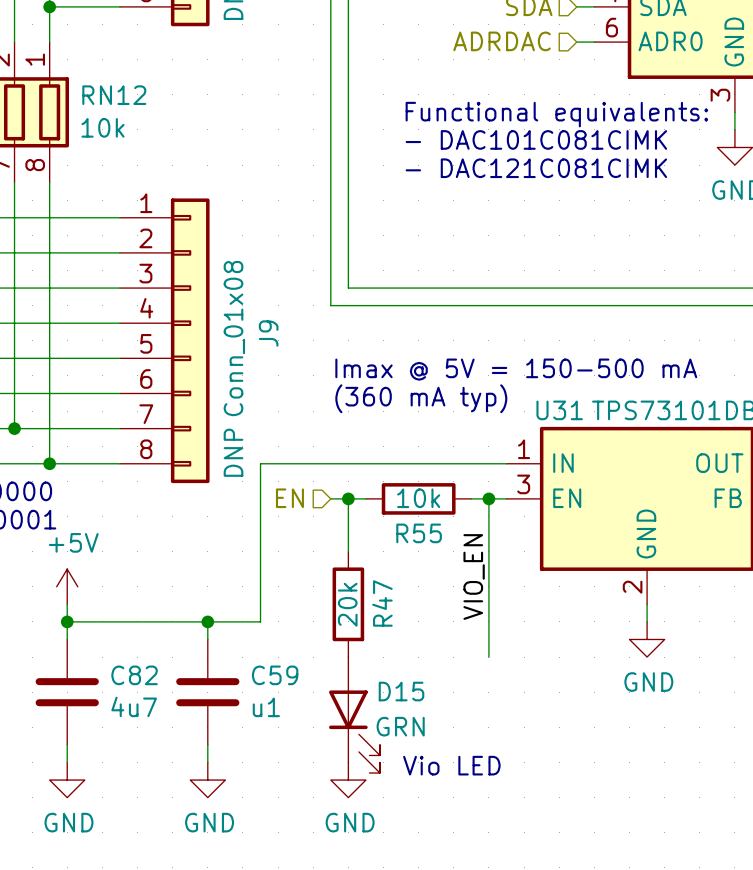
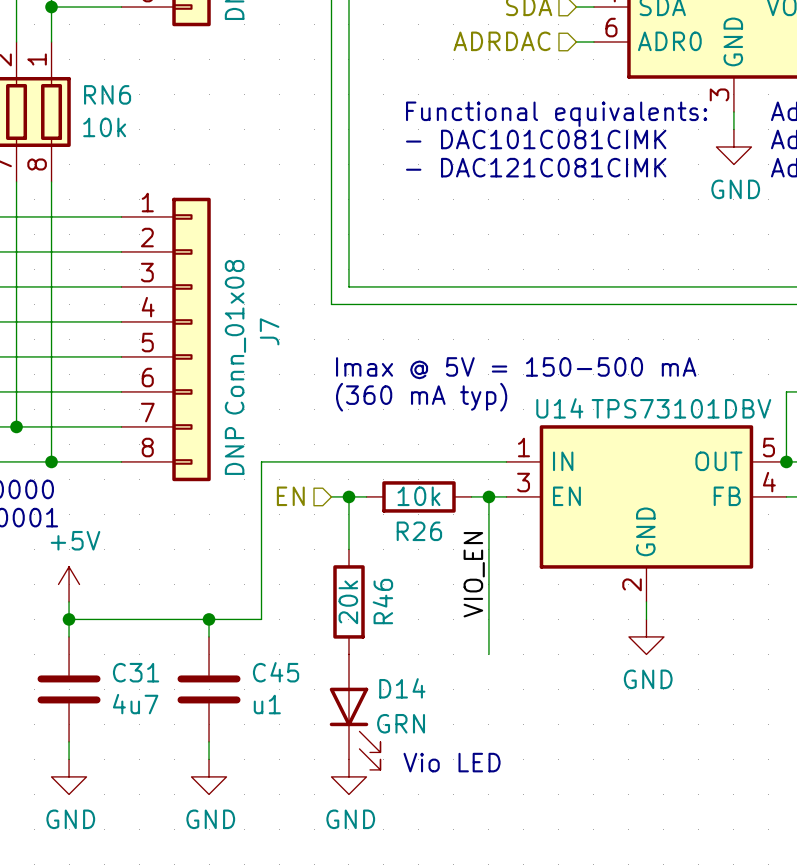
RN12 name: RN12 (114, 95) -> RN6 (107, 94)
J9 name: J9 (268, 333) -> J7 (269, 331)
U31 name: U31 (559, 410) -> U14 (559, 408)
R55 name: R55 (419, 533) -> R26 (419, 531)
R47 name: R47 (382, 603) -> R46 (382, 601)
C82 name: C82 (134, 675) -> C31 (136, 672)
C59 name: C59 (275, 675) -> C45 (276, 672)
D15 name: D15 (401, 691) -> D14 (402, 688)

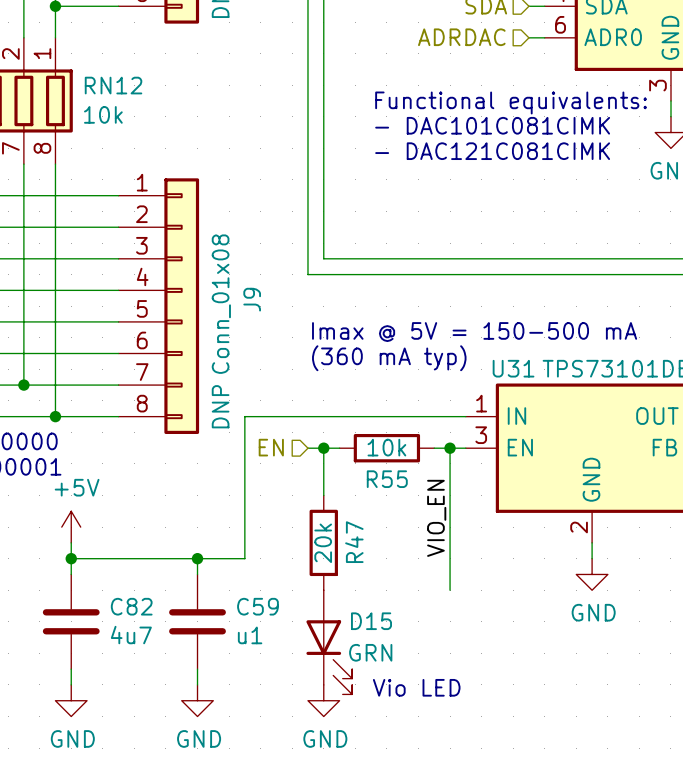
RN6 name: RN6 (107, 94) -> RN12 (113, 85)
J7 name: J7 (269, 331) -> J9 (252, 299)
U14 name: U14 (559, 408) -> U31 (513, 368)
R26 name: R26 (419, 531) -> R55 (387, 479)
R46 name: R46 (382, 601) -> R47 (354, 542)
C31 name: C31 (136, 672) -> C82 (131, 606)
C45 name: C45 (276, 672) -> C59 (257, 606)
D14 name: D14 (402, 688) -> D15 (371, 621)

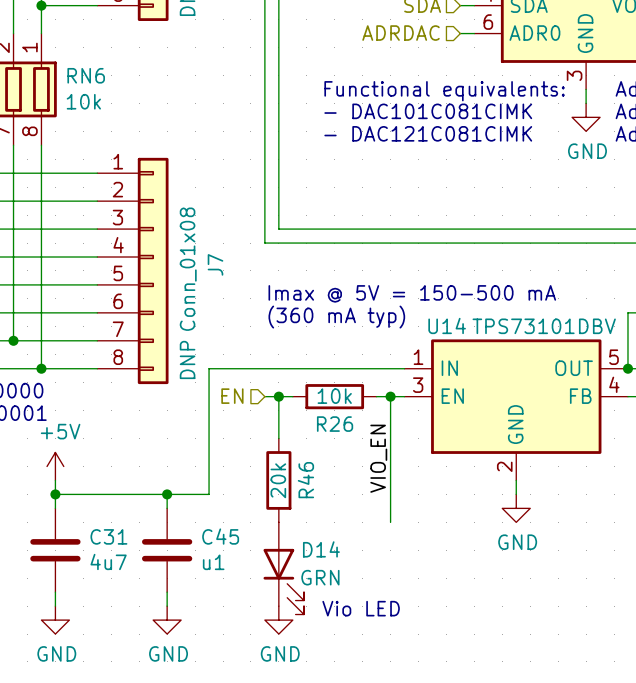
RN12 name: RN12 (113, 85) -> RN6 (86, 75)
J9 name: J9 (252, 299) -> J7 (215, 264)
U31 name: U31 (513, 368) -> U14 (447, 325)
R55 name: R55 (387, 479) -> R26 (335, 424)
R47 name: R47 (354, 542) -> R46 (305, 480)
C82 name: C82 (131, 606) -> C31 (108, 536)
C59 name: C59 (257, 606) -> C45 (220, 536)
D15 name: D15 (371, 621) -> D14 (321, 549)

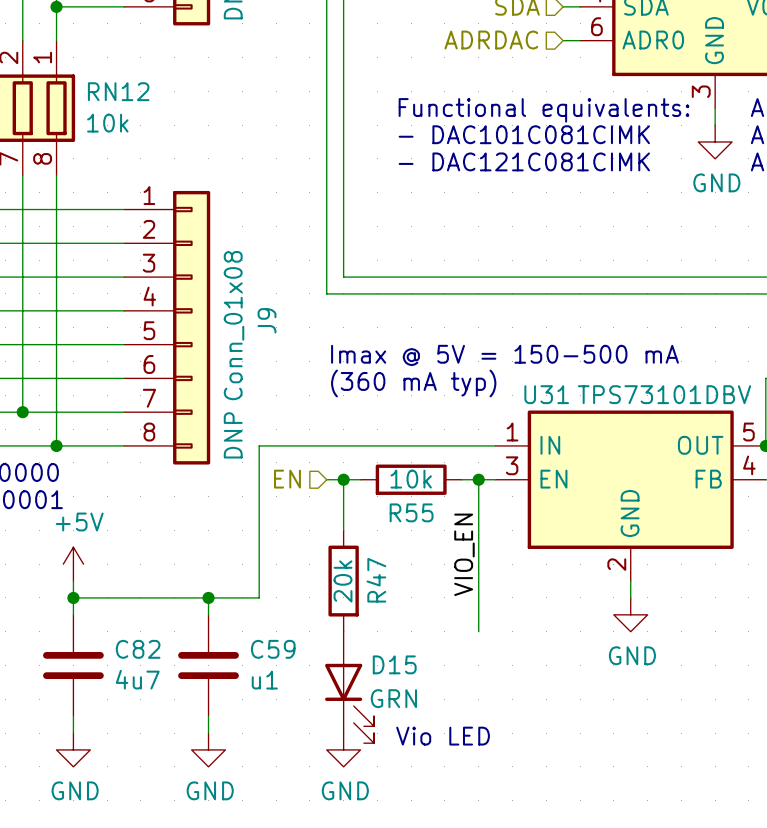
RN6 name: RN6 (86, 75) -> RN12 (118, 91)
J7 name: J7 (215, 264) -> J9 (267, 320)
U14 name: U14 (447, 325) -> U31 (546, 394)
R26 name: R26 (335, 424) -> R55 (411, 512)
R46 name: R46 (305, 480) -> R47 (376, 580)
C31 name: C31 (108, 536) -> C82 (138, 649)
C45 name: C45 (220, 536) -> C59 (273, 649)
D14 name: D14 (321, 549) -> D15 (394, 664)

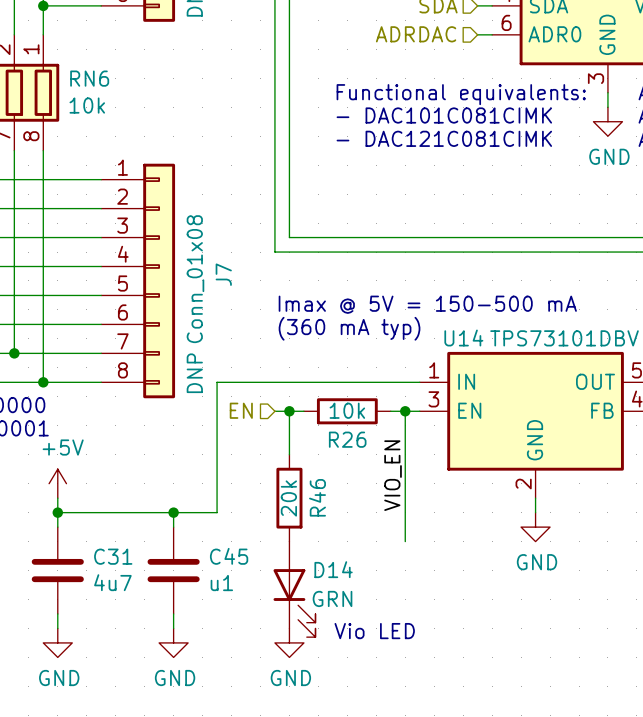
RN12 name: RN12 (118, 91) -> RN6 (89, 78)
J9 name: J9 (267, 320) -> J7 (223, 274)
U31 name: U31 (546, 394) -> U14 (463, 338)
R55 name: R55 (411, 512) -> R26 (347, 439)
R47 name: R47 (376, 580) -> R46 (317, 497)
C82 name: C82 (138, 649) -> C31 (113, 556)
C59 name: C59 (273, 649) -> C45 (229, 556)
D15 name: D15 (394, 664) -> D14 (333, 569)

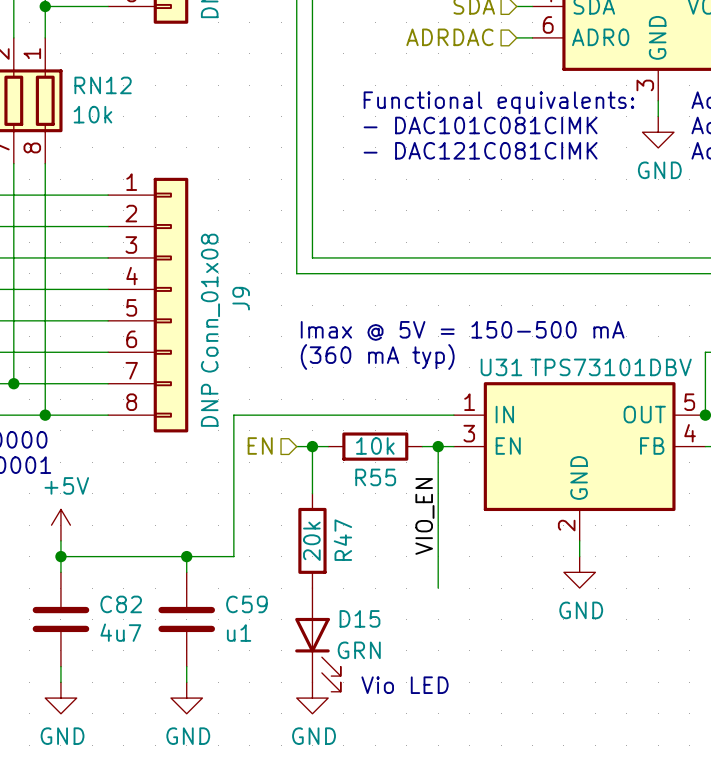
RN6 name: RN6 (89, 78) -> RN12 (103, 85)
J7 name: J7 (223, 274) -> J9 (241, 298)
U14 name: U14 (463, 338) -> U31 (501, 367)
R26 name: R26 (347, 439) -> R55 (375, 477)
R46 name: R46 (317, 497) -> R47 (342, 540)
C31 name: C31 (113, 556) -> C82 (121, 604)
C45 name: C45 (229, 556) -> C59 (246, 604)
D14 name: D14 (333, 569) -> D15 (359, 618)

